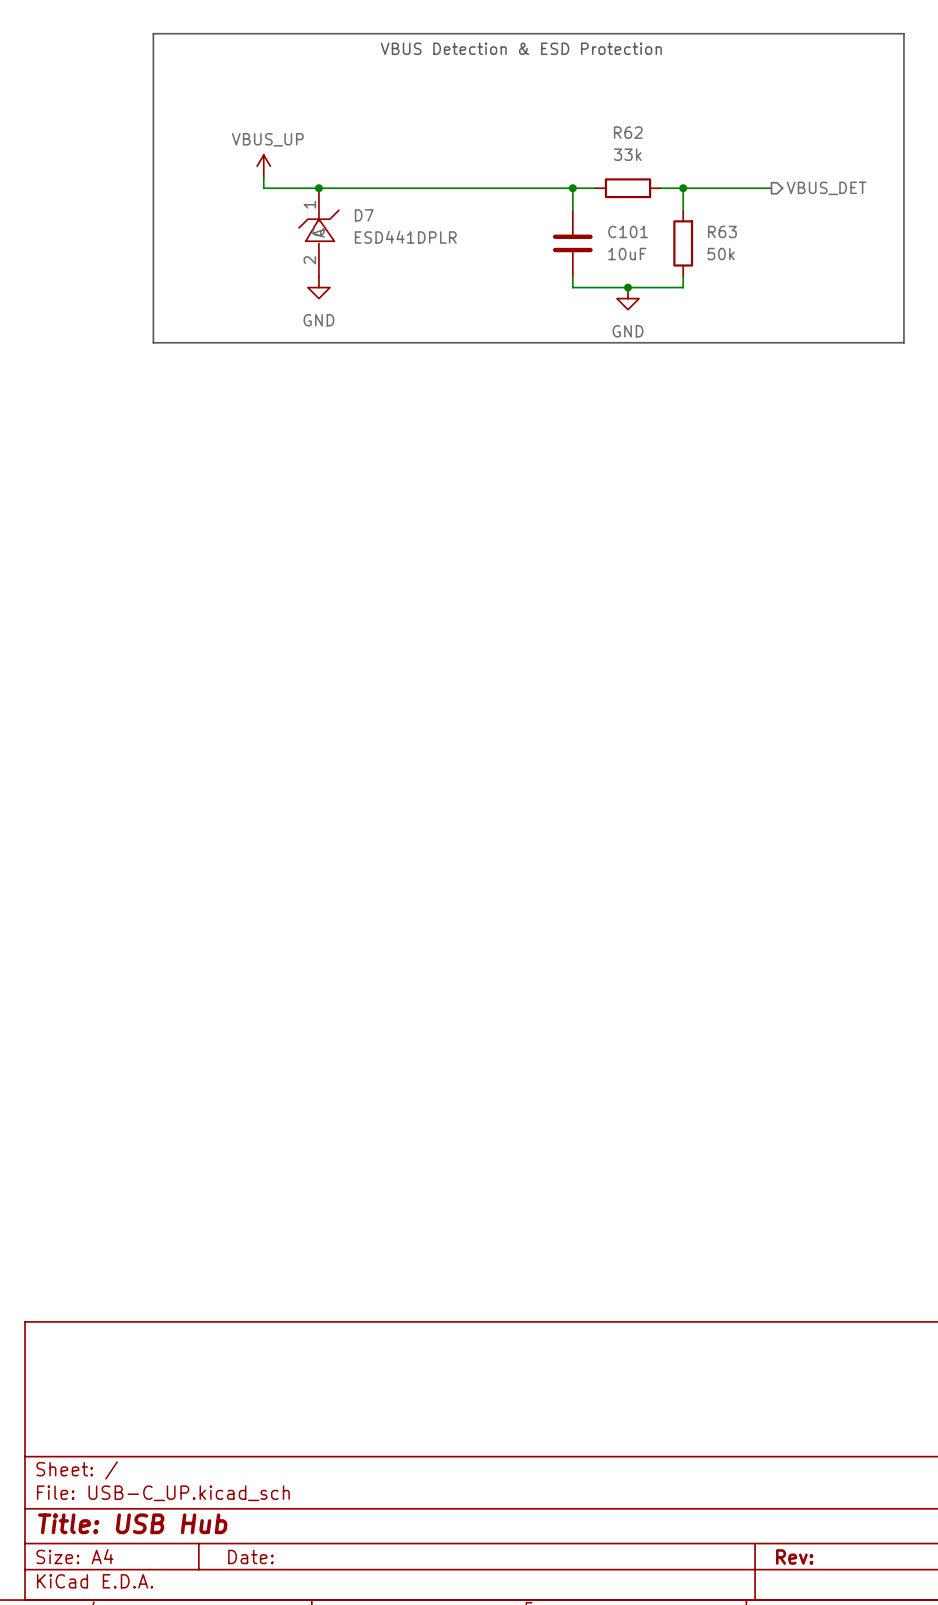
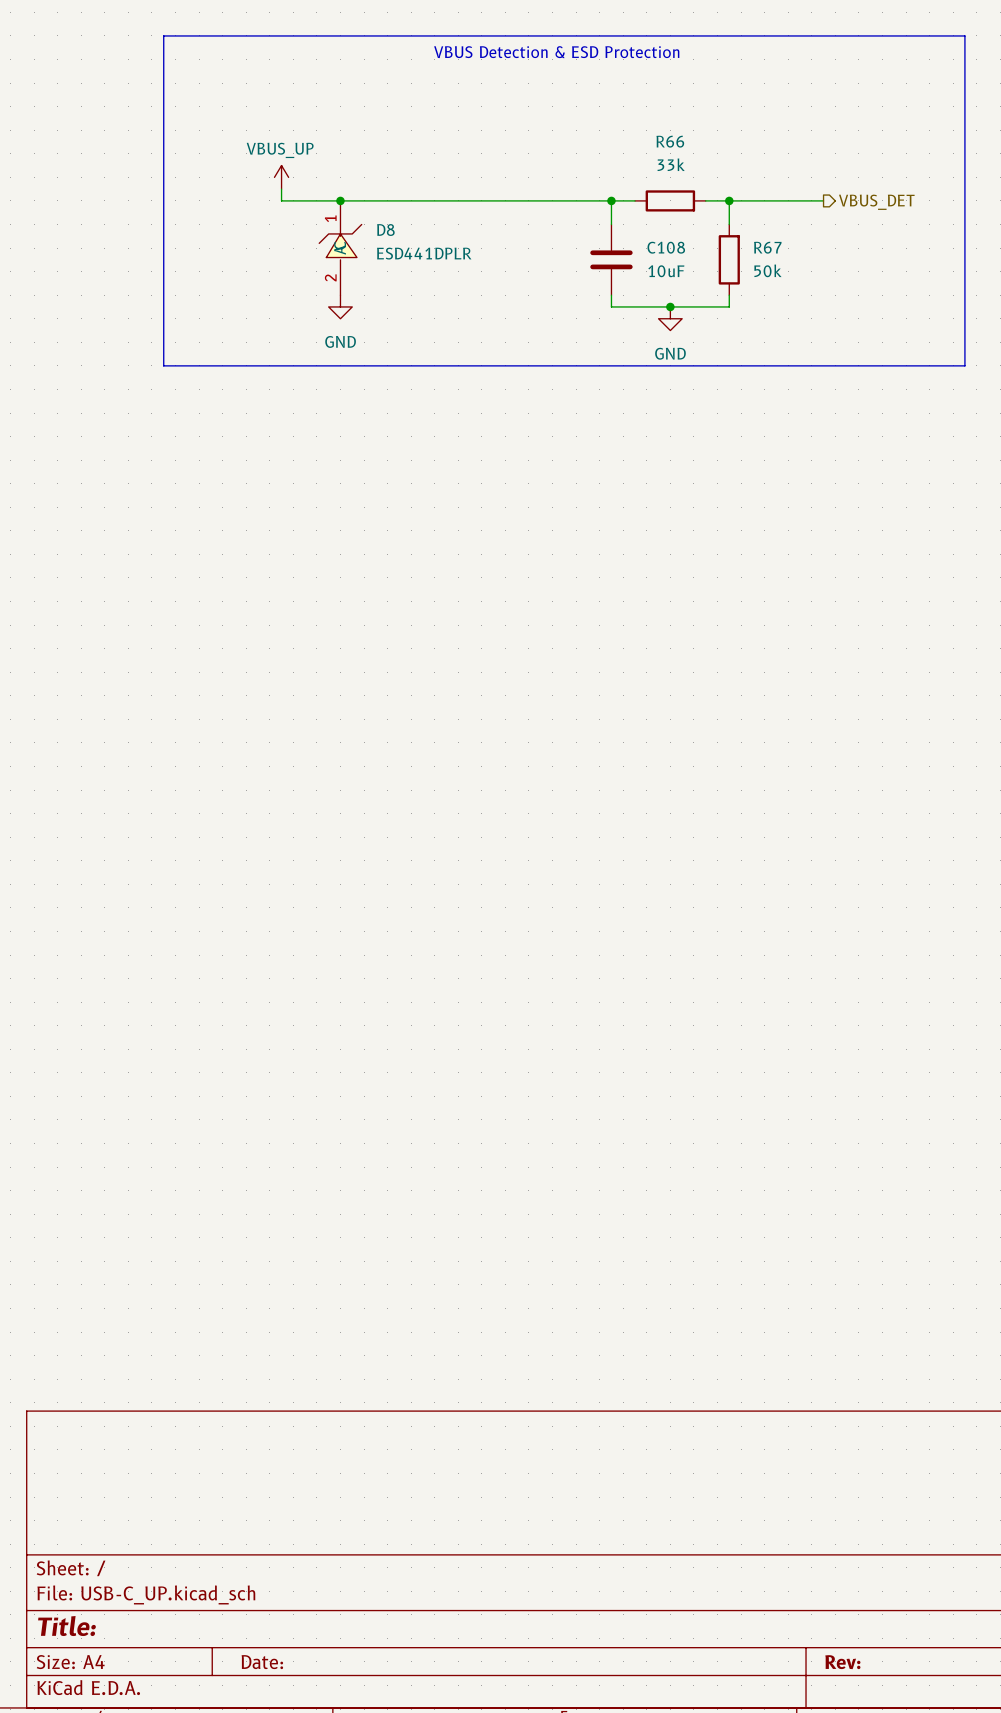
R62 name: R62 (628, 132) -> R66 (670, 141)
D7 name: D7 (364, 215) -> D8 (385, 230)
C101 name: C101 (628, 231) -> C108 (666, 247)
R63 name: R63 (722, 231) -> R67 (767, 247)
title block: Title: USB Hub (132, 1523) -> Title: (66, 1626)

